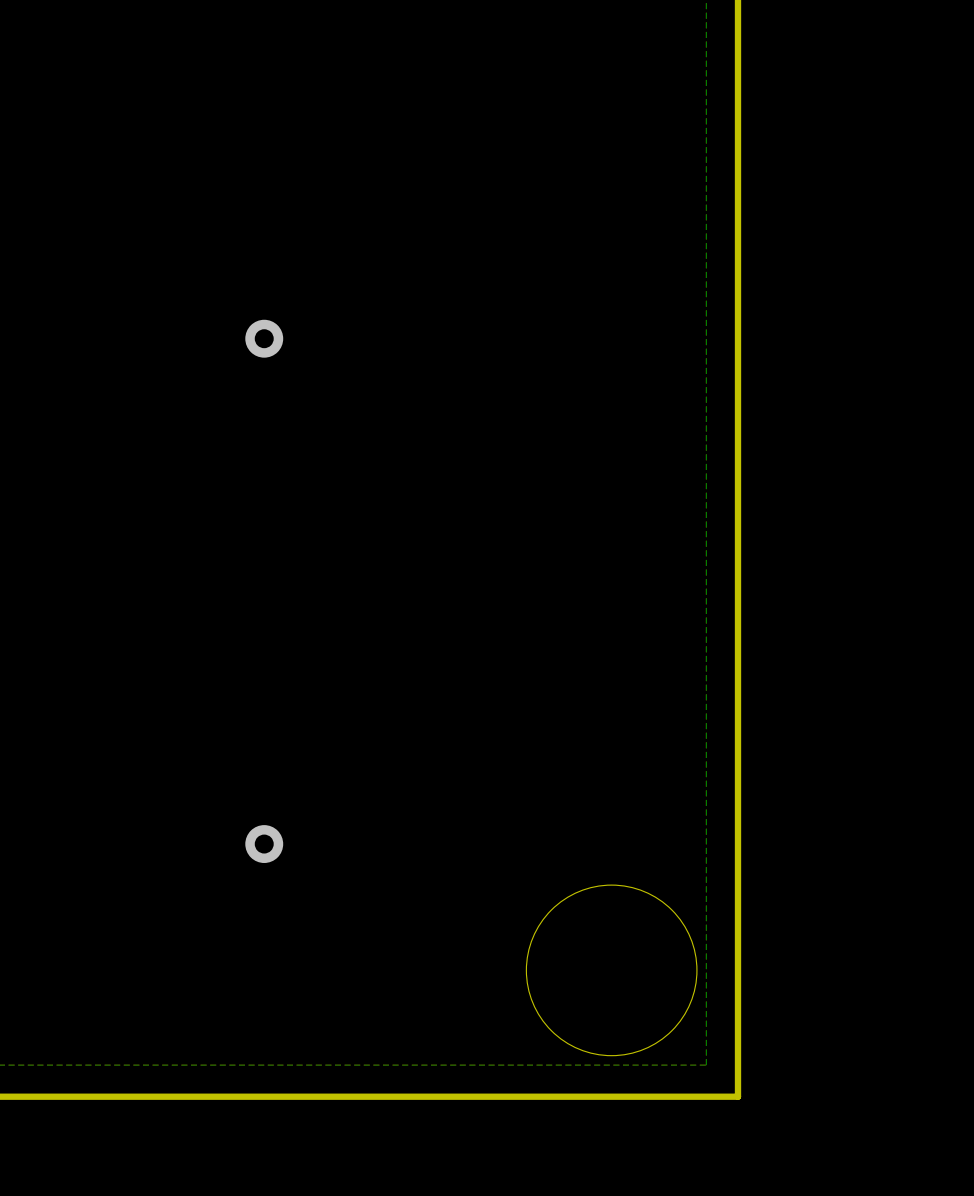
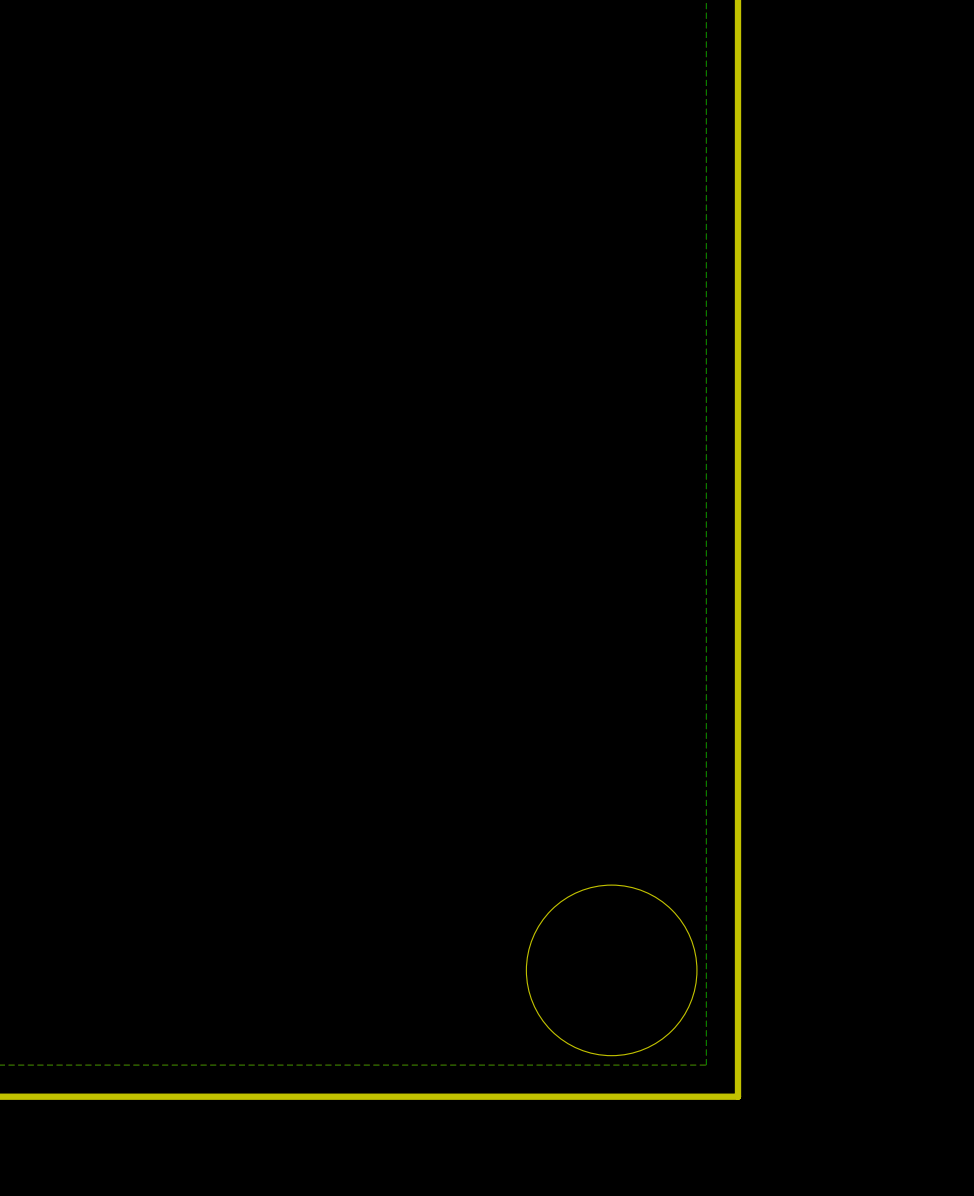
via: (264, 338) -> none
via: (264, 844) -> none

